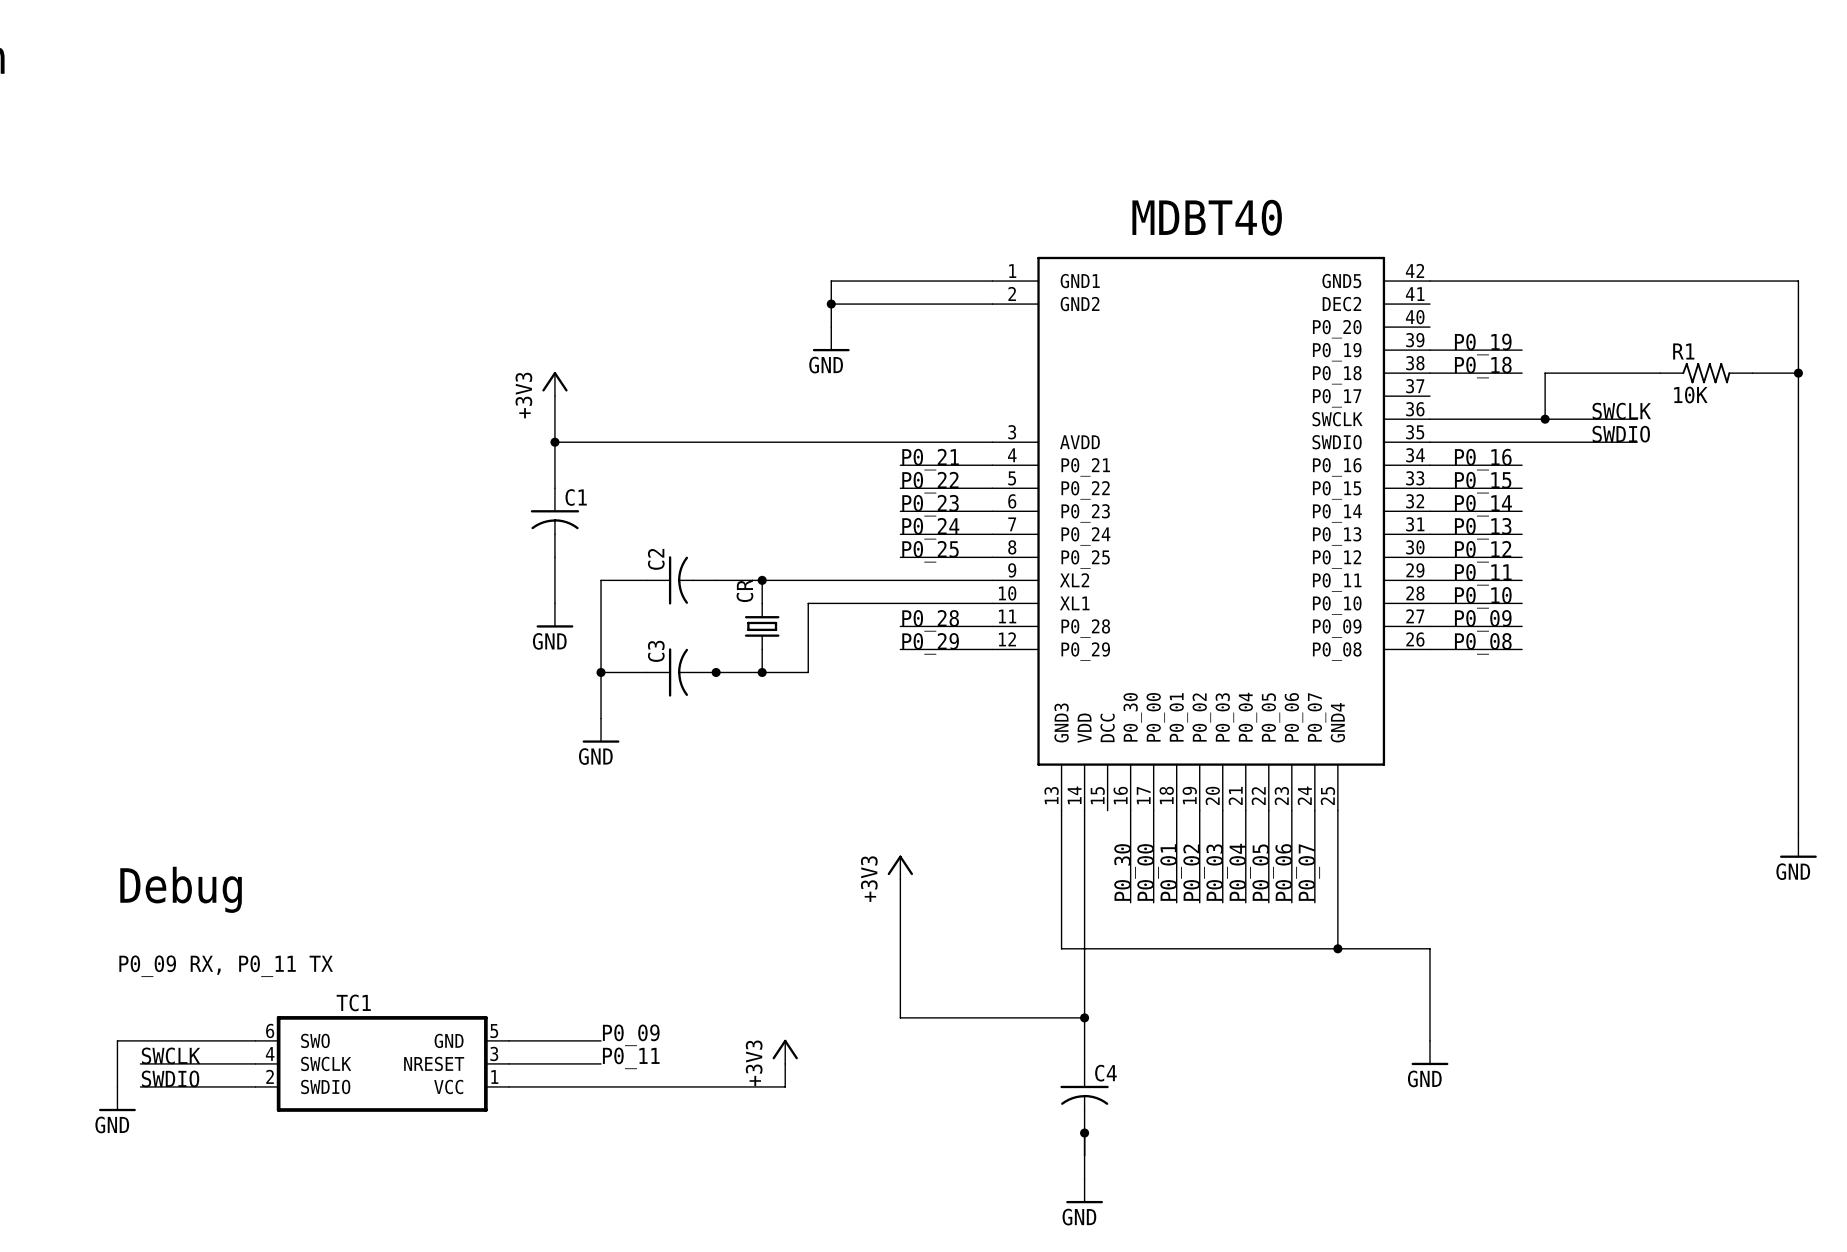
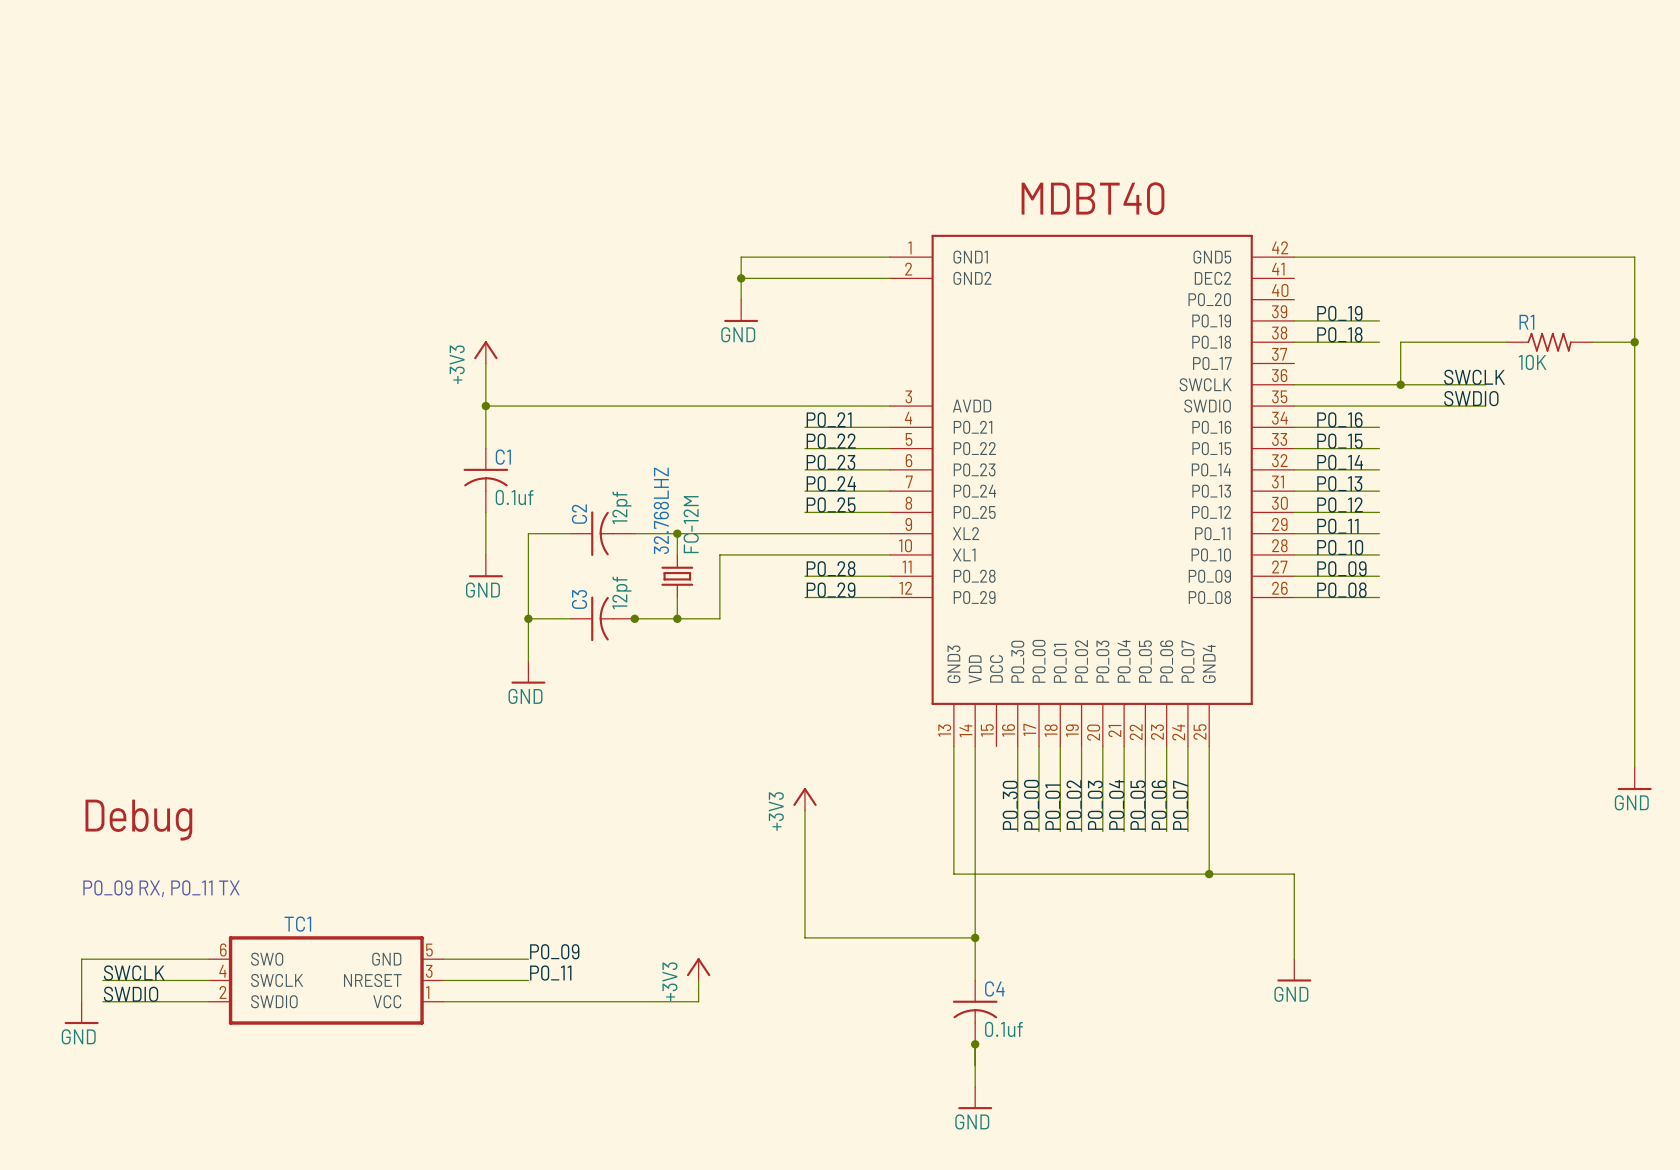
C1 value: none -> 0.1uf (514, 497)
C2 value: none -> 12pf (621, 507)
CR value: none -> FC-12M (691, 524)
CR name: CR (744, 590) -> 32.768LHZ (661, 510)
C3 value: none -> 12pf (621, 592)
C4 value: none -> 0.1uf (1003, 1029)

